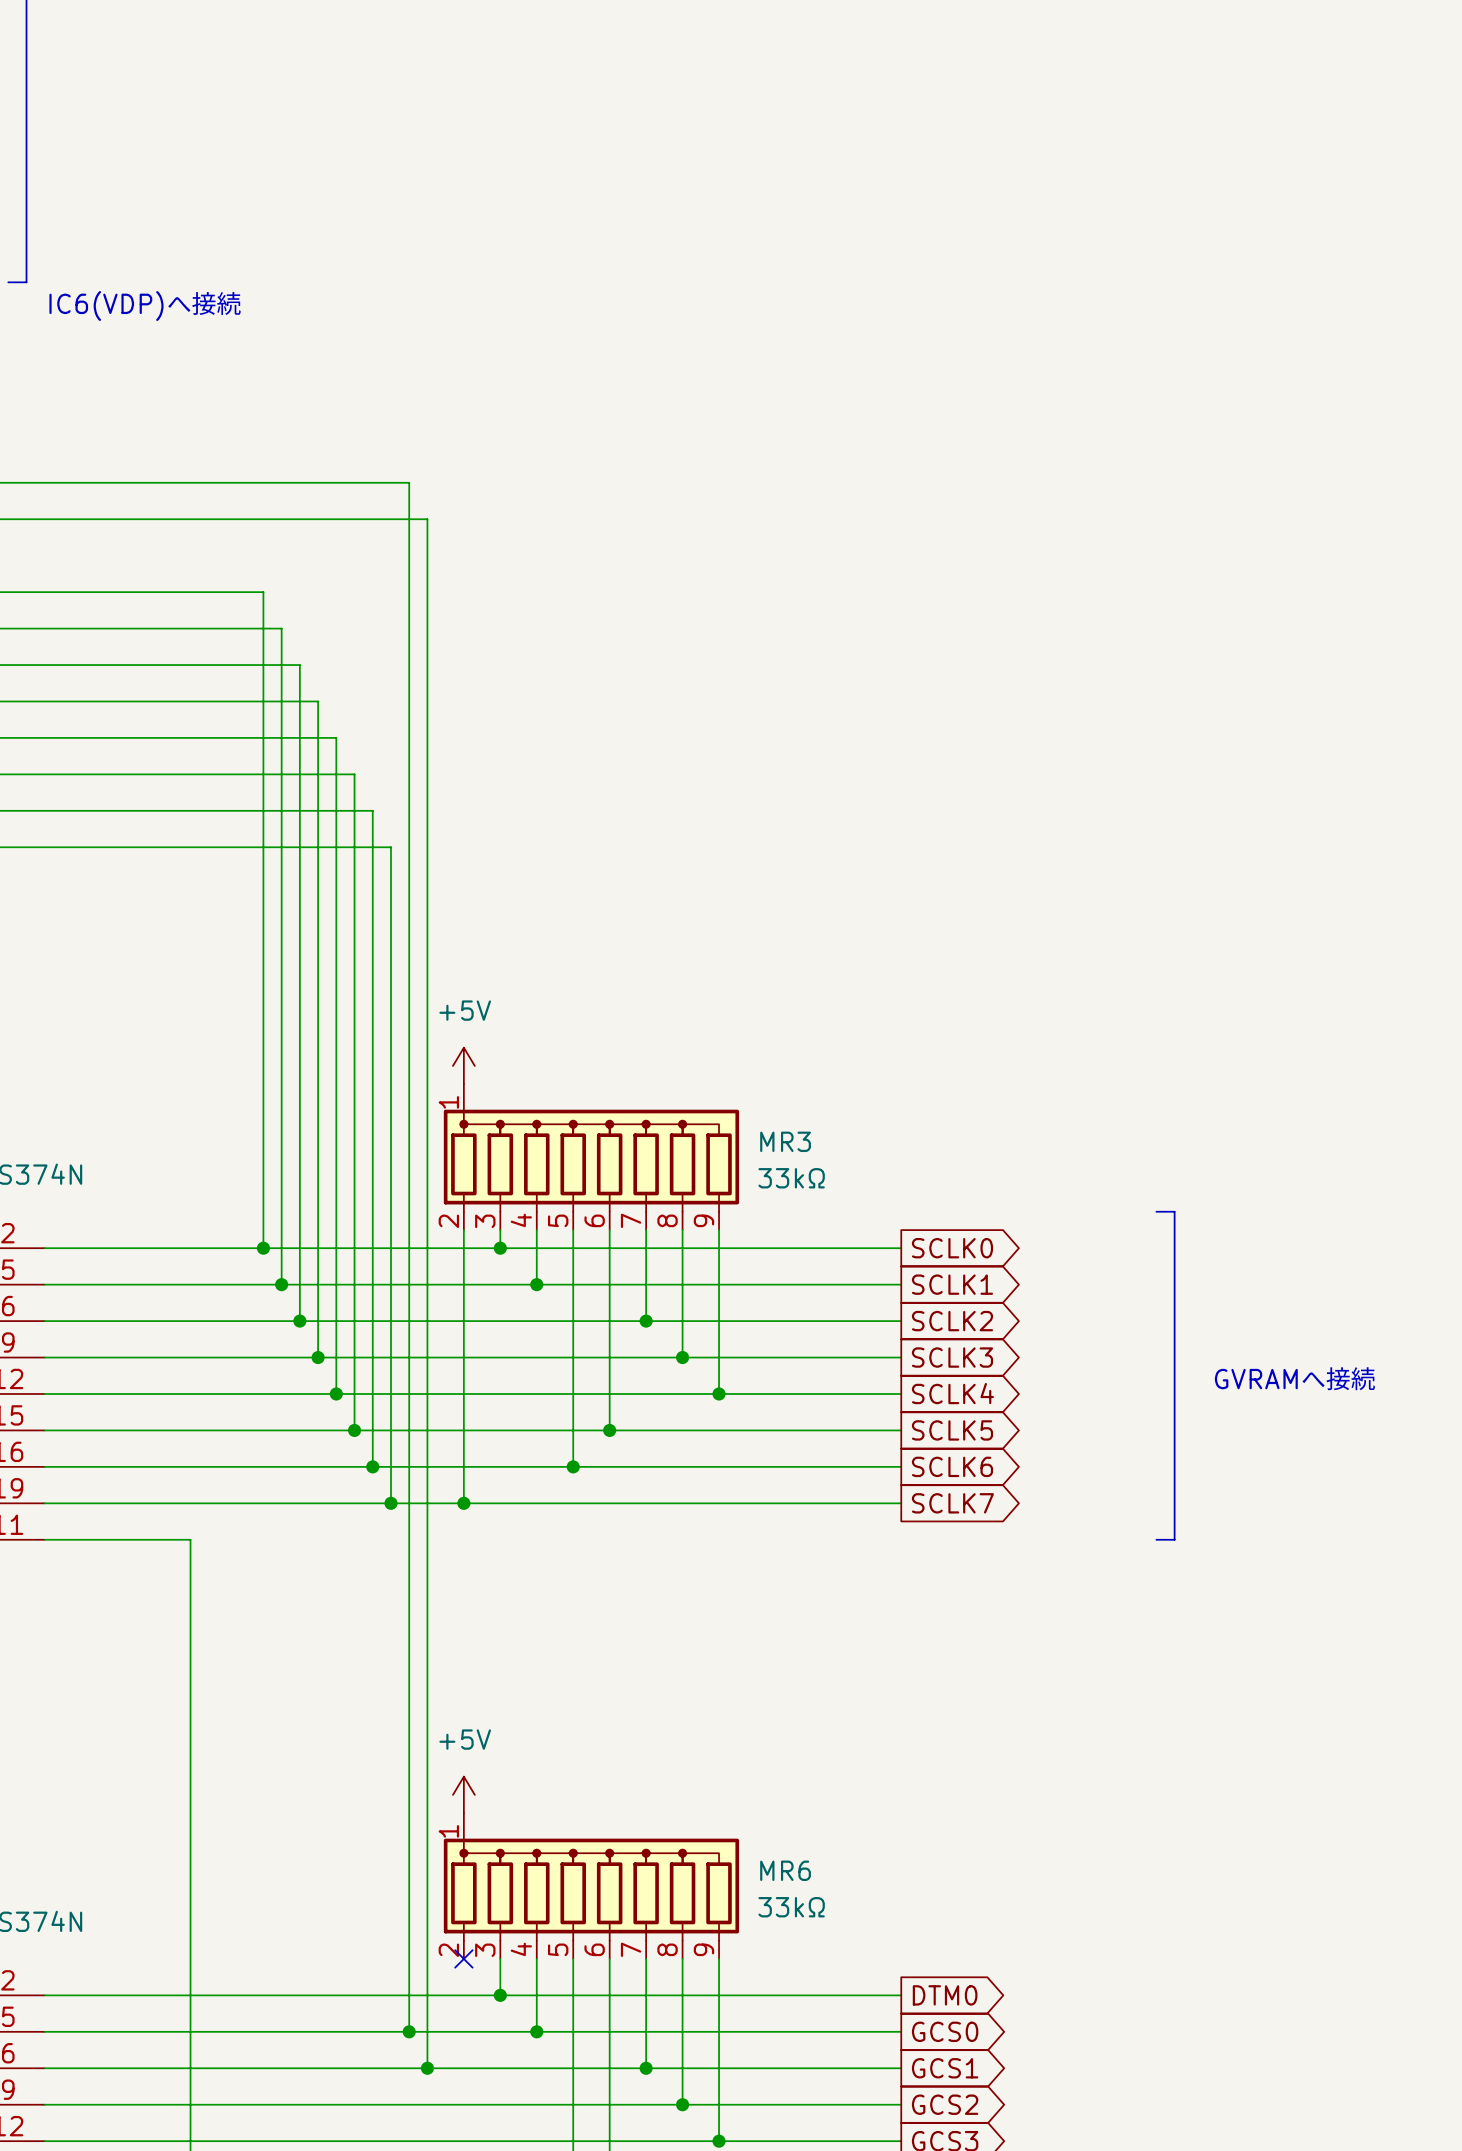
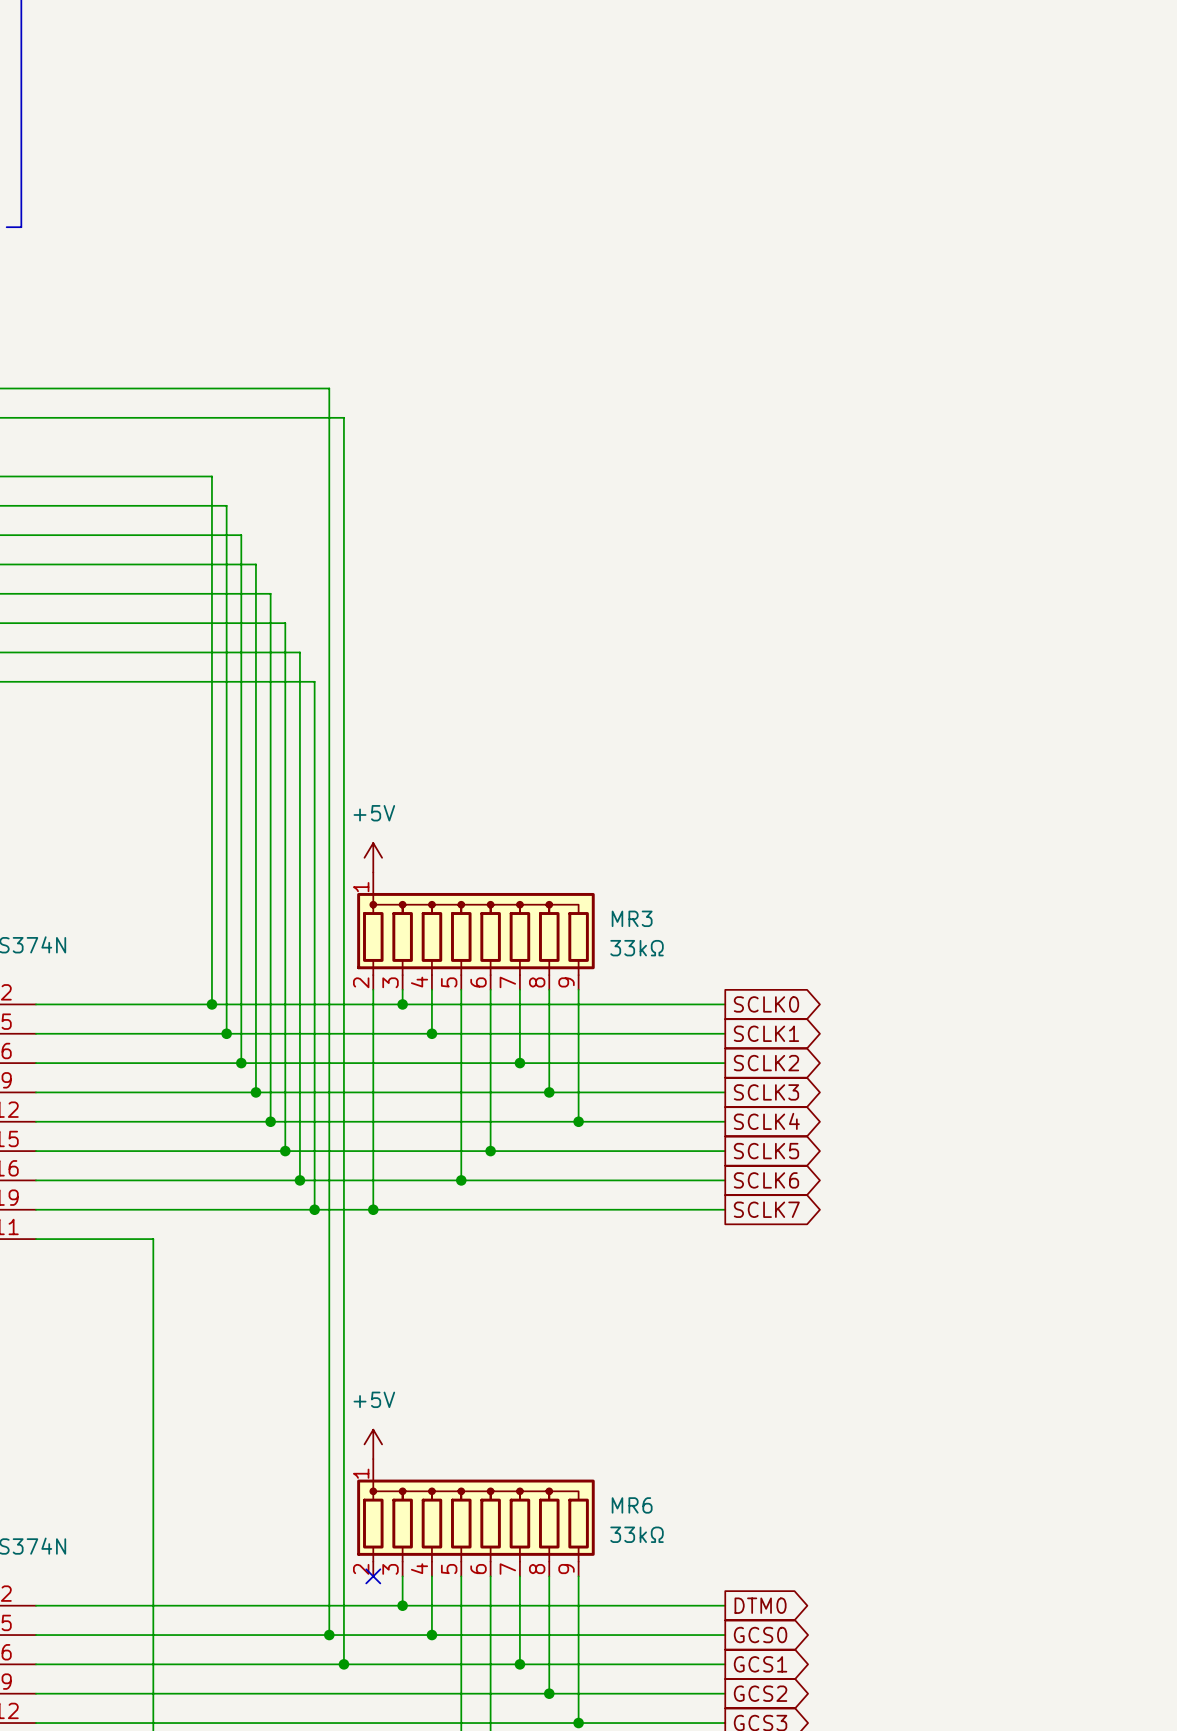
text: IC6(VDP)へ接続 (145, 305) -> none
line: (1156, 1211) (1174, 1211) (1174, 1539) (1156, 1539) -> none
text: GVRAMへ接続 (1295, 1378) -> none

